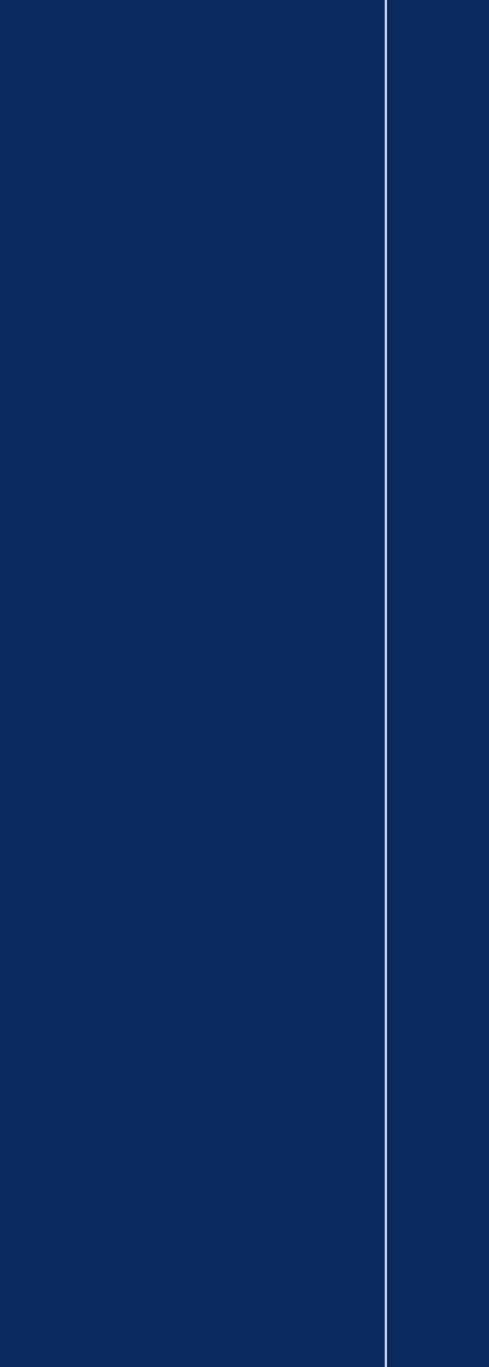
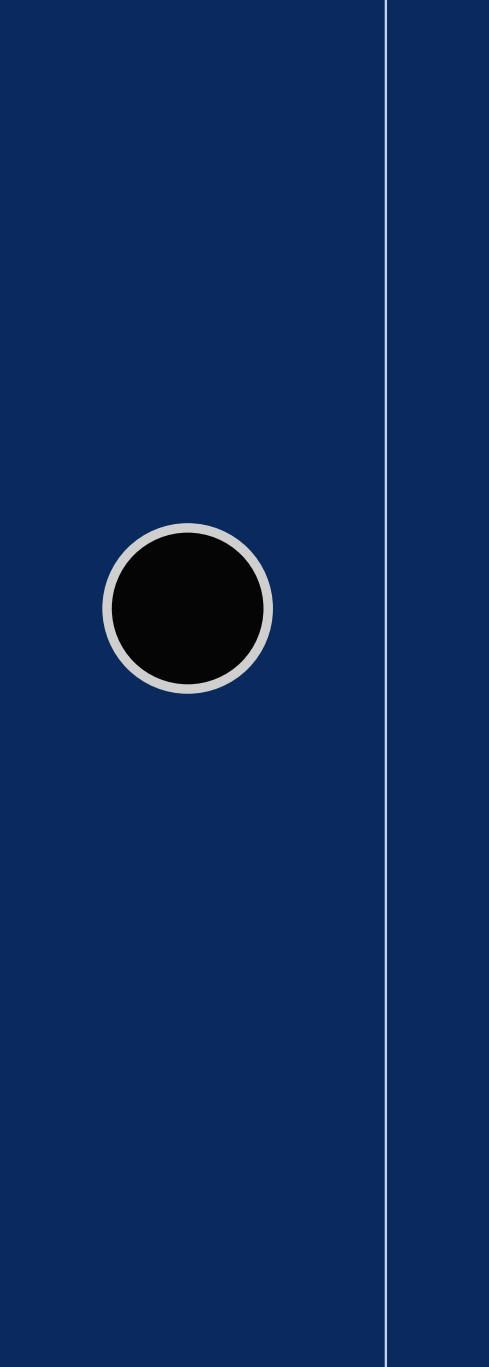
part: none -> (187, 608)

